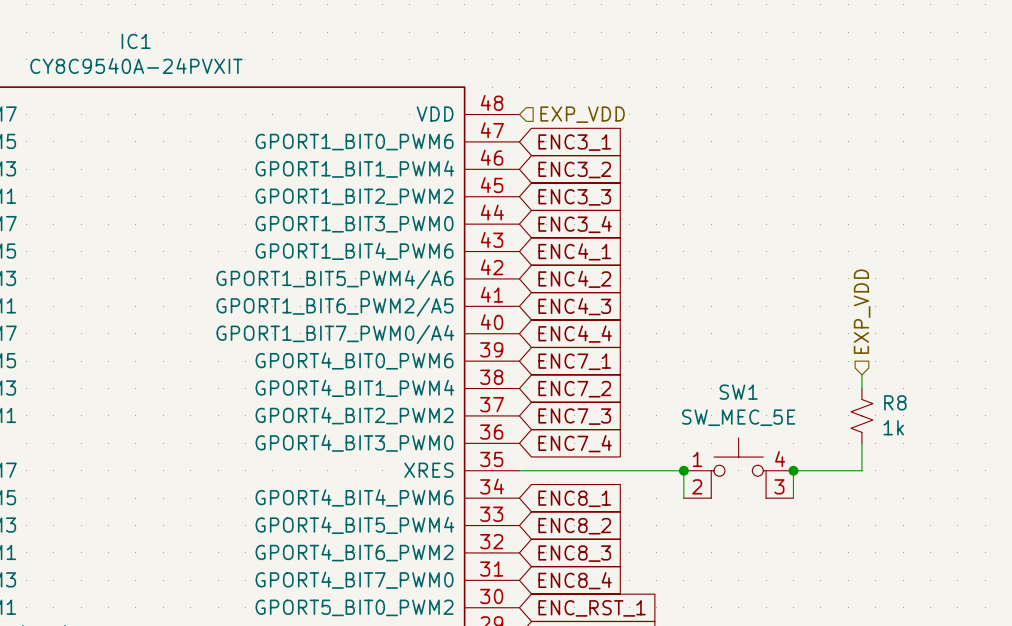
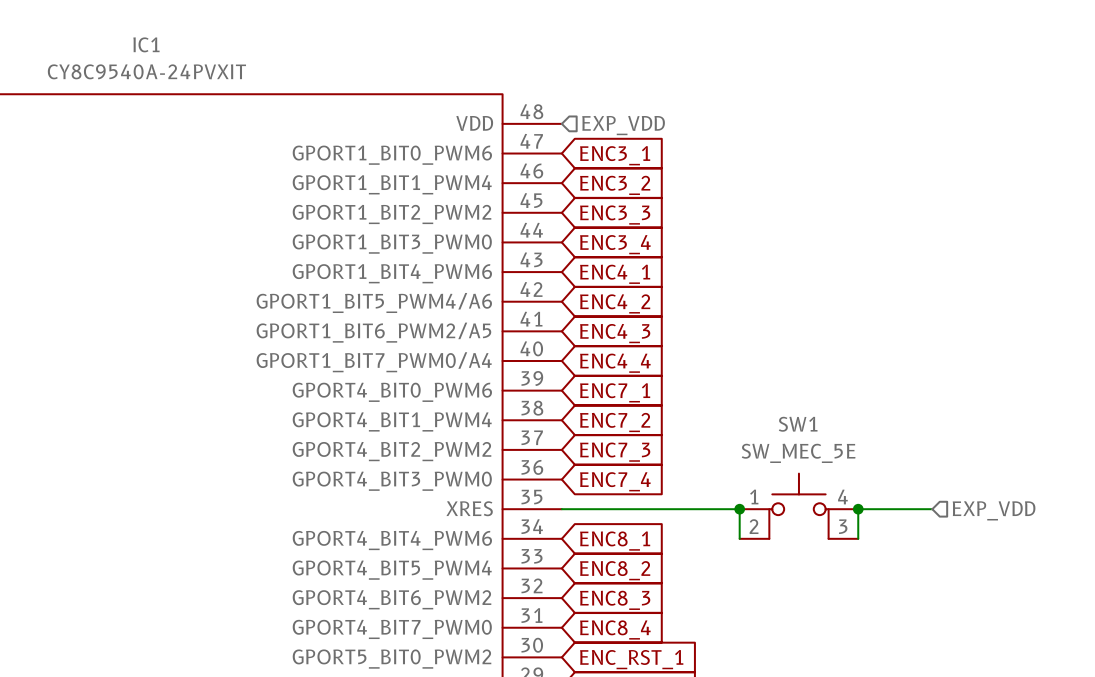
hierarchical label rotation: 0° (862, 311) -> 90° clockwise (994, 510)
hierarchical label position: EXP_VDD (862, 311) -> EXP_VDD (994, 510)
wire: (861, 374) (861, 388) -> none
R8: 1k (861, 415) -> none
wire: (861, 443) (861, 470) -> none

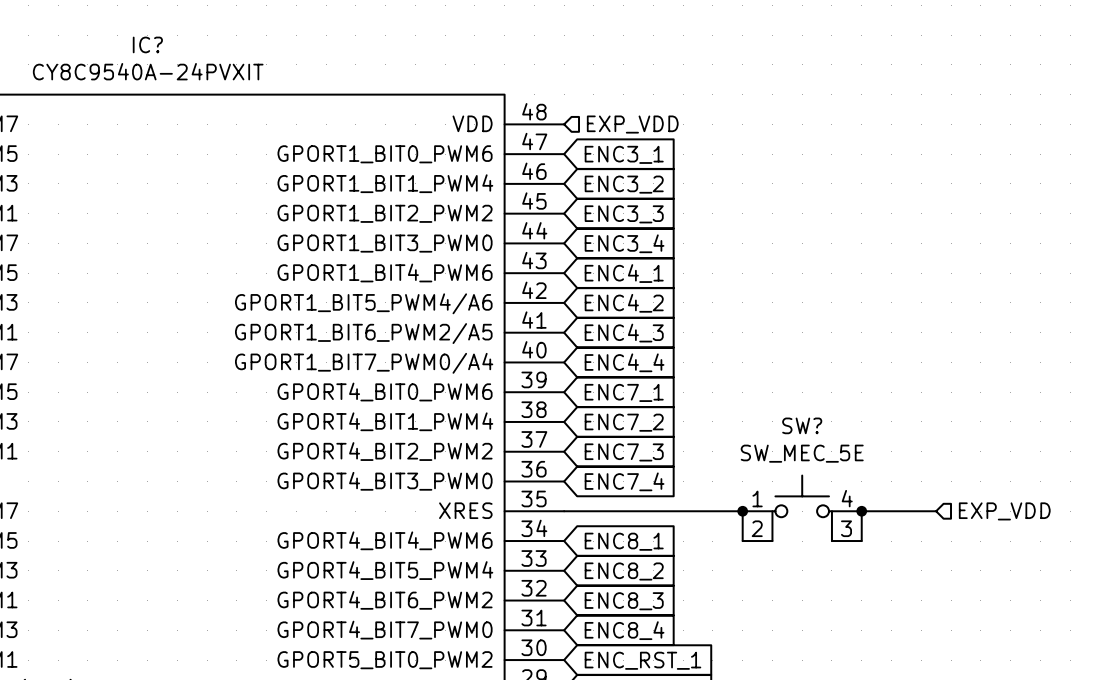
IC1 name: IC1 (146, 44) -> IC? (147, 44)
SW1 name: SW1 (798, 424) -> SW? (802, 425)

